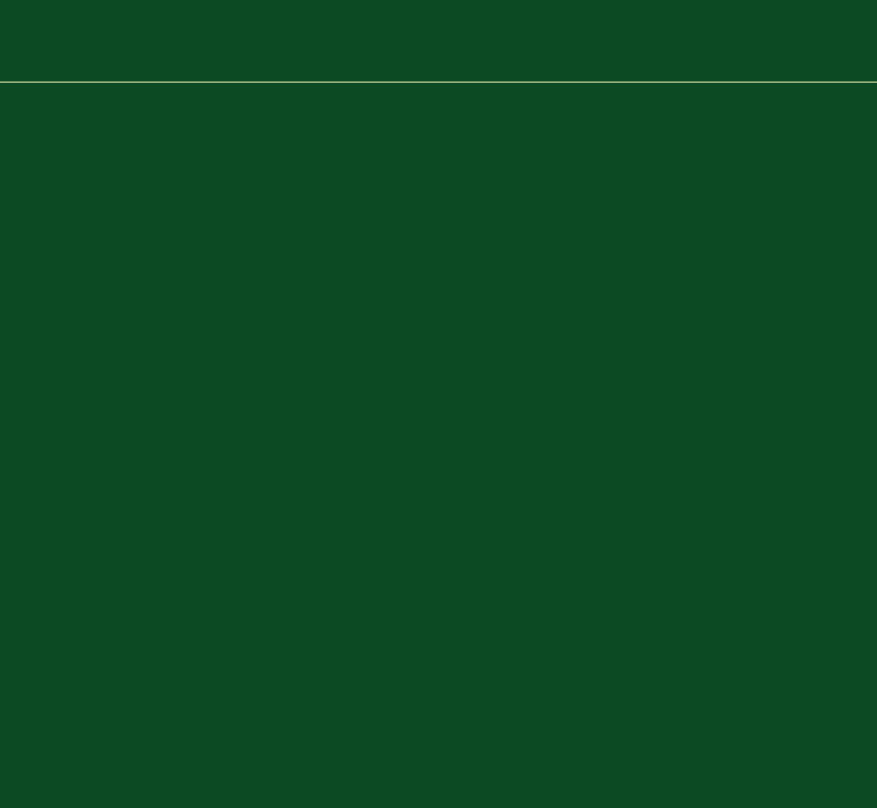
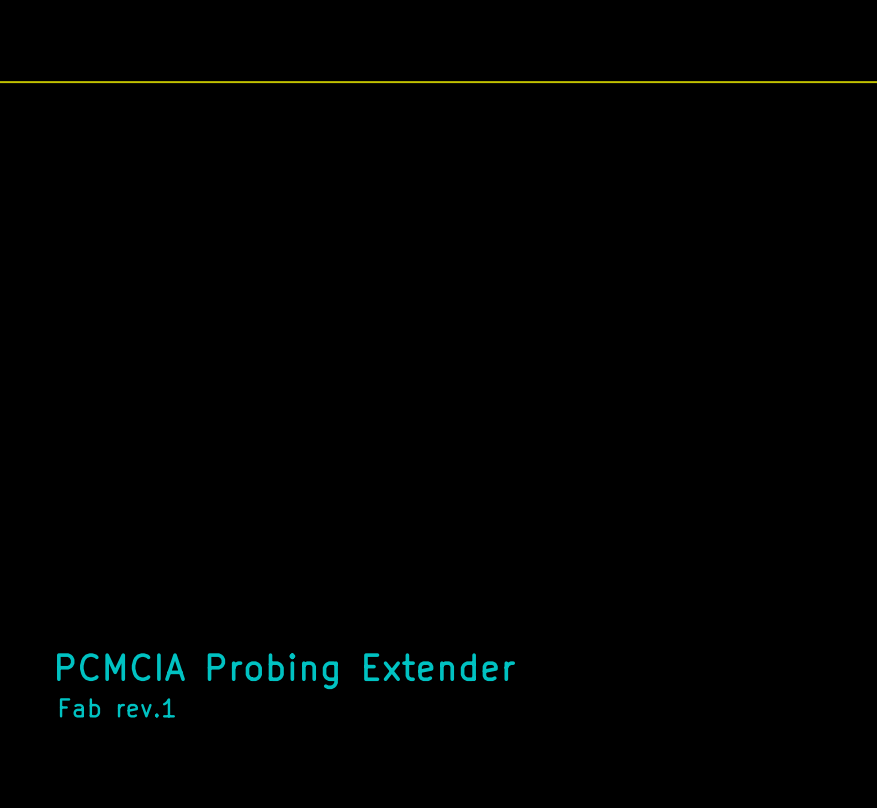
text: none -> PCMCIA Probing Extender (286, 671)
text: none -> Fab rev.1 (117, 707)

